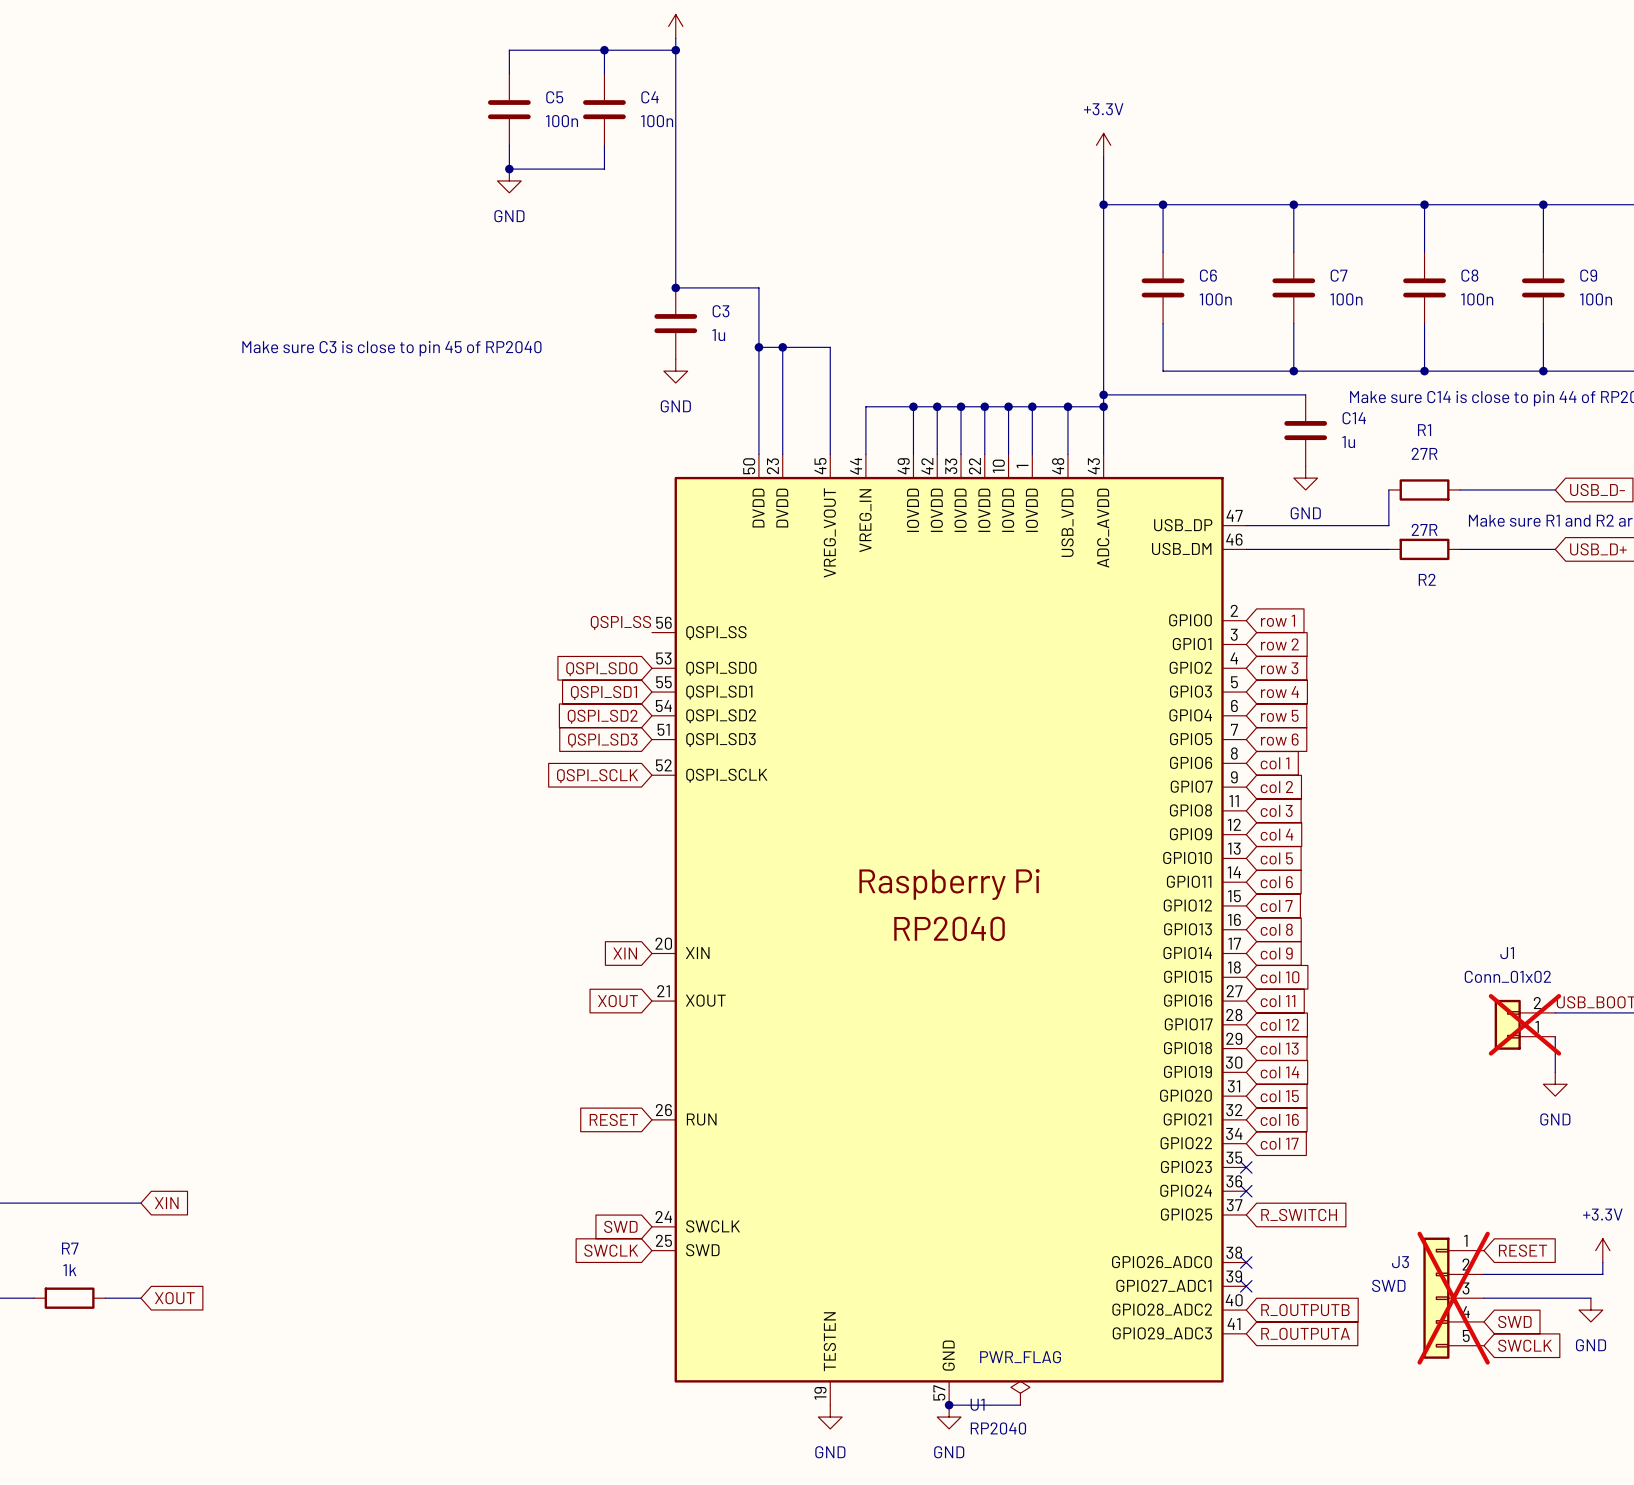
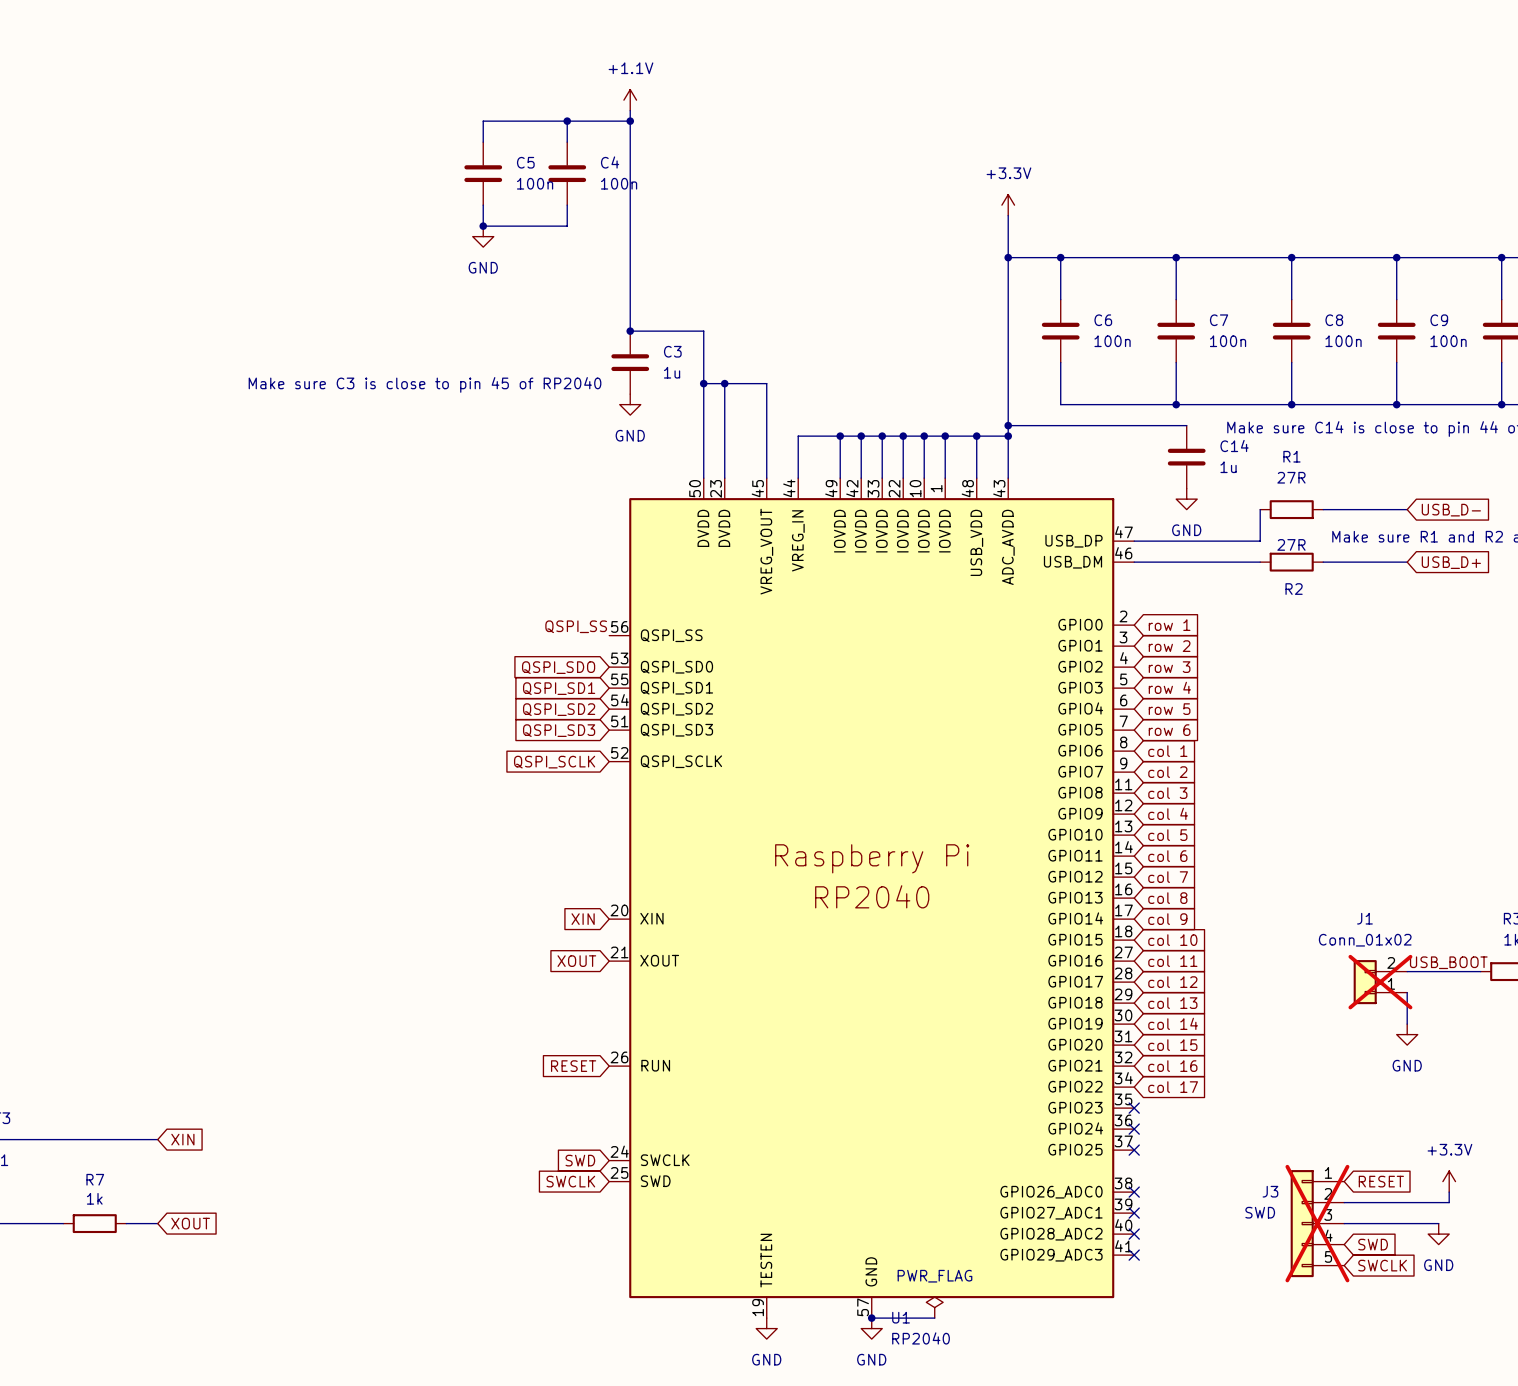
no-connect mark: none -> (1134, 1150)
global label: R_SWITCH (1299, 1214) -> none
no-connect mark: none -> (1134, 1234)
global label: R_OUTPUTB (1305, 1310) -> none
no-connect mark: none -> (1134, 1255)
global label: R_OUTPUTA (1305, 1333) -> none

